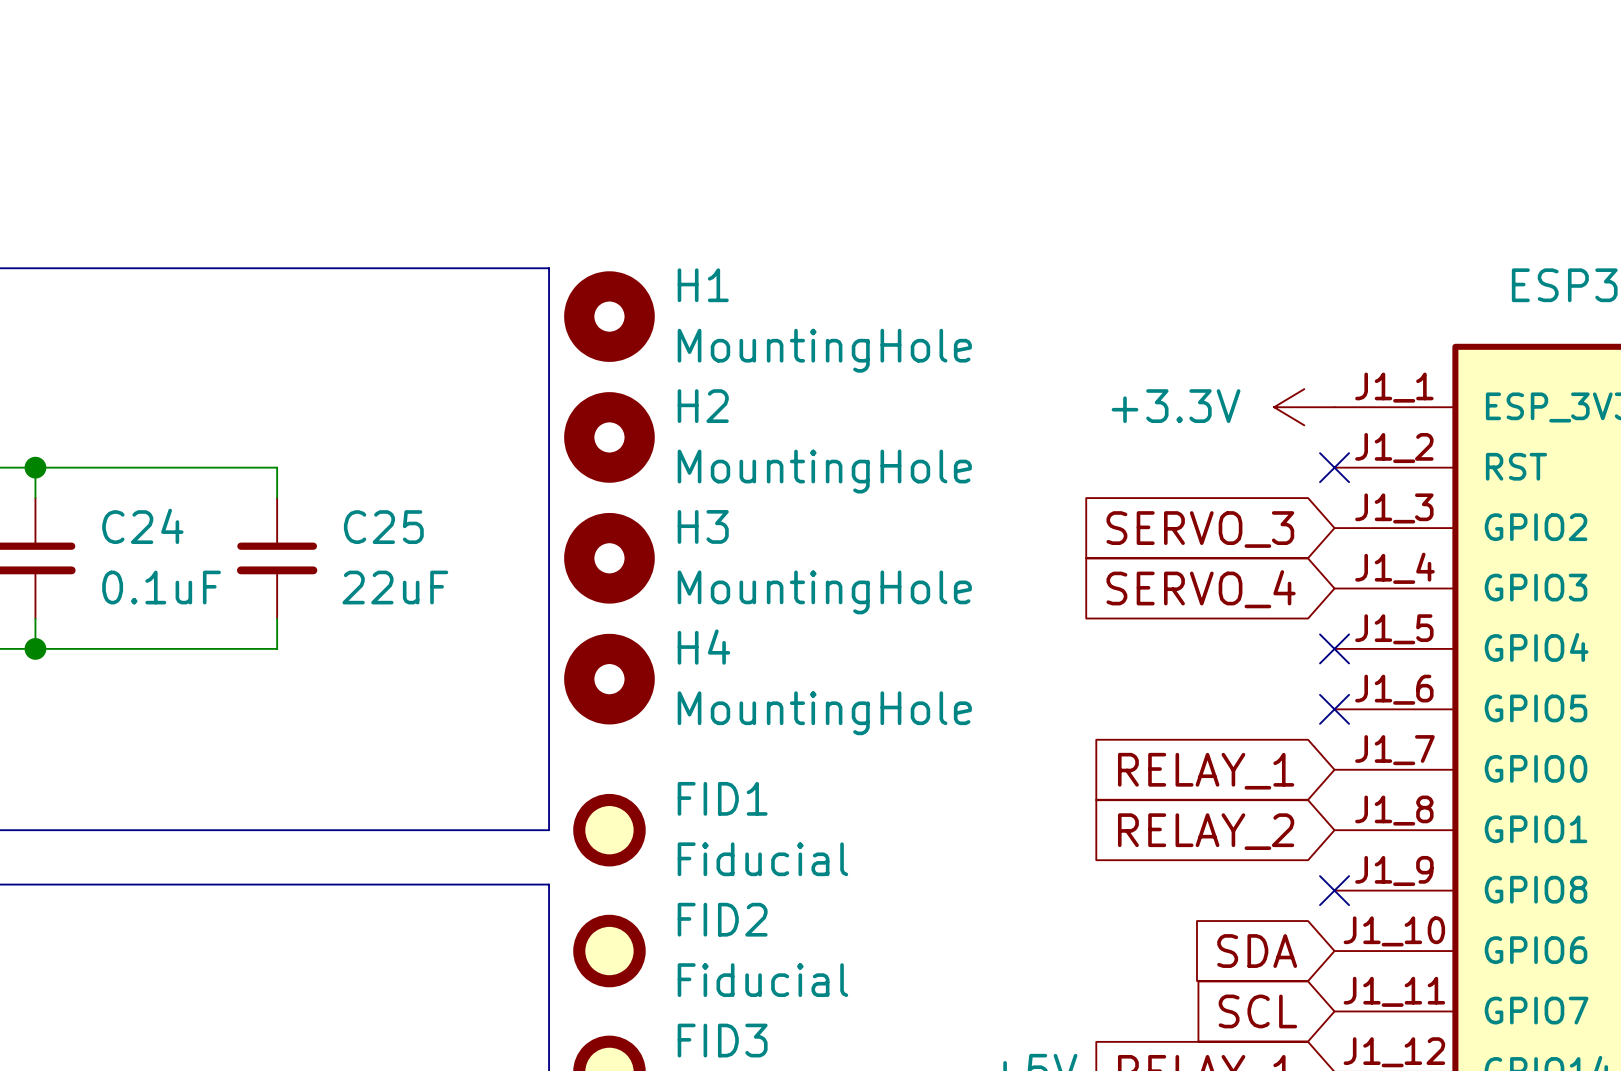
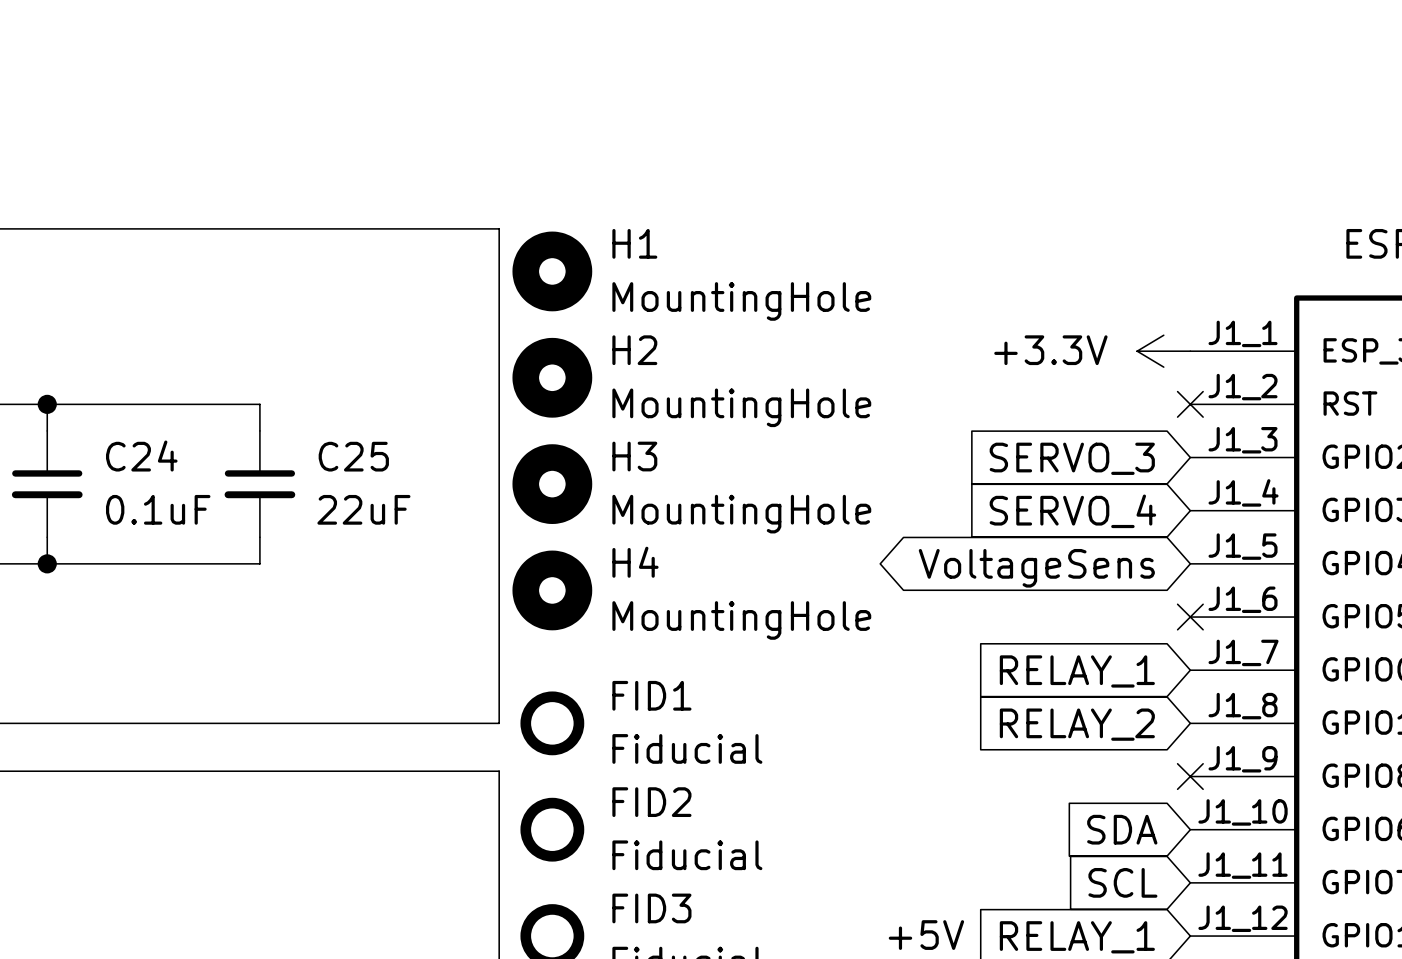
no-connect mark: (1334, 648) -> none
global label: none -> VoltageSens (1036, 568)

